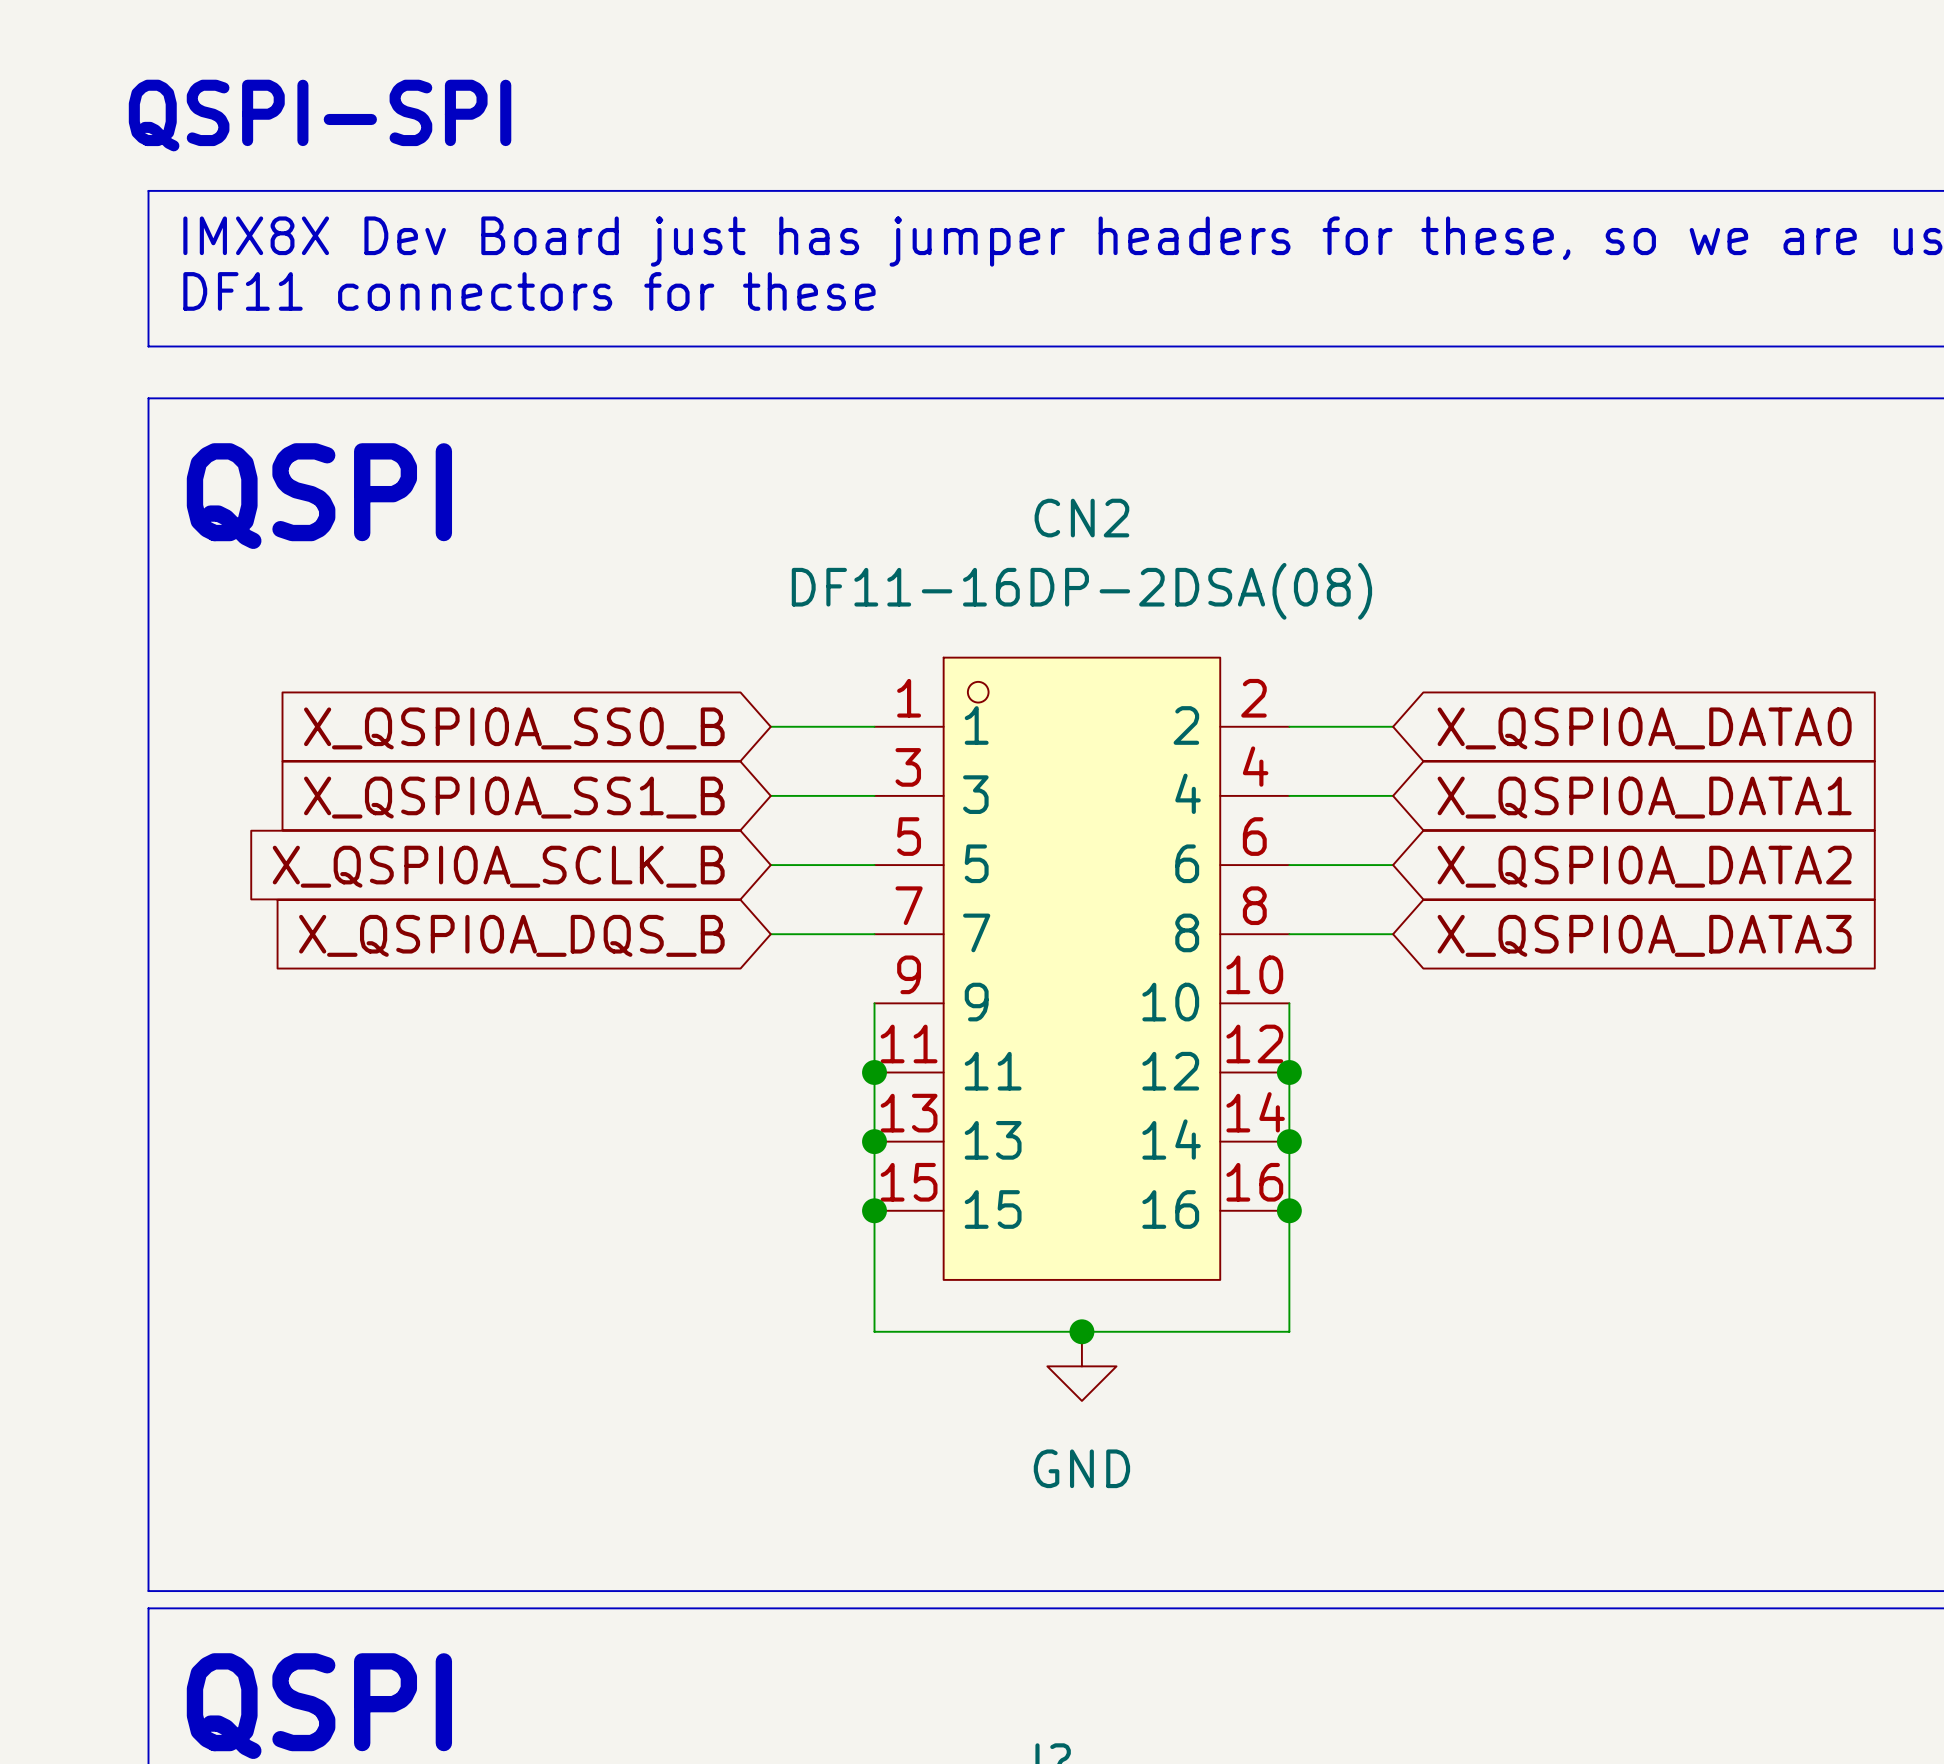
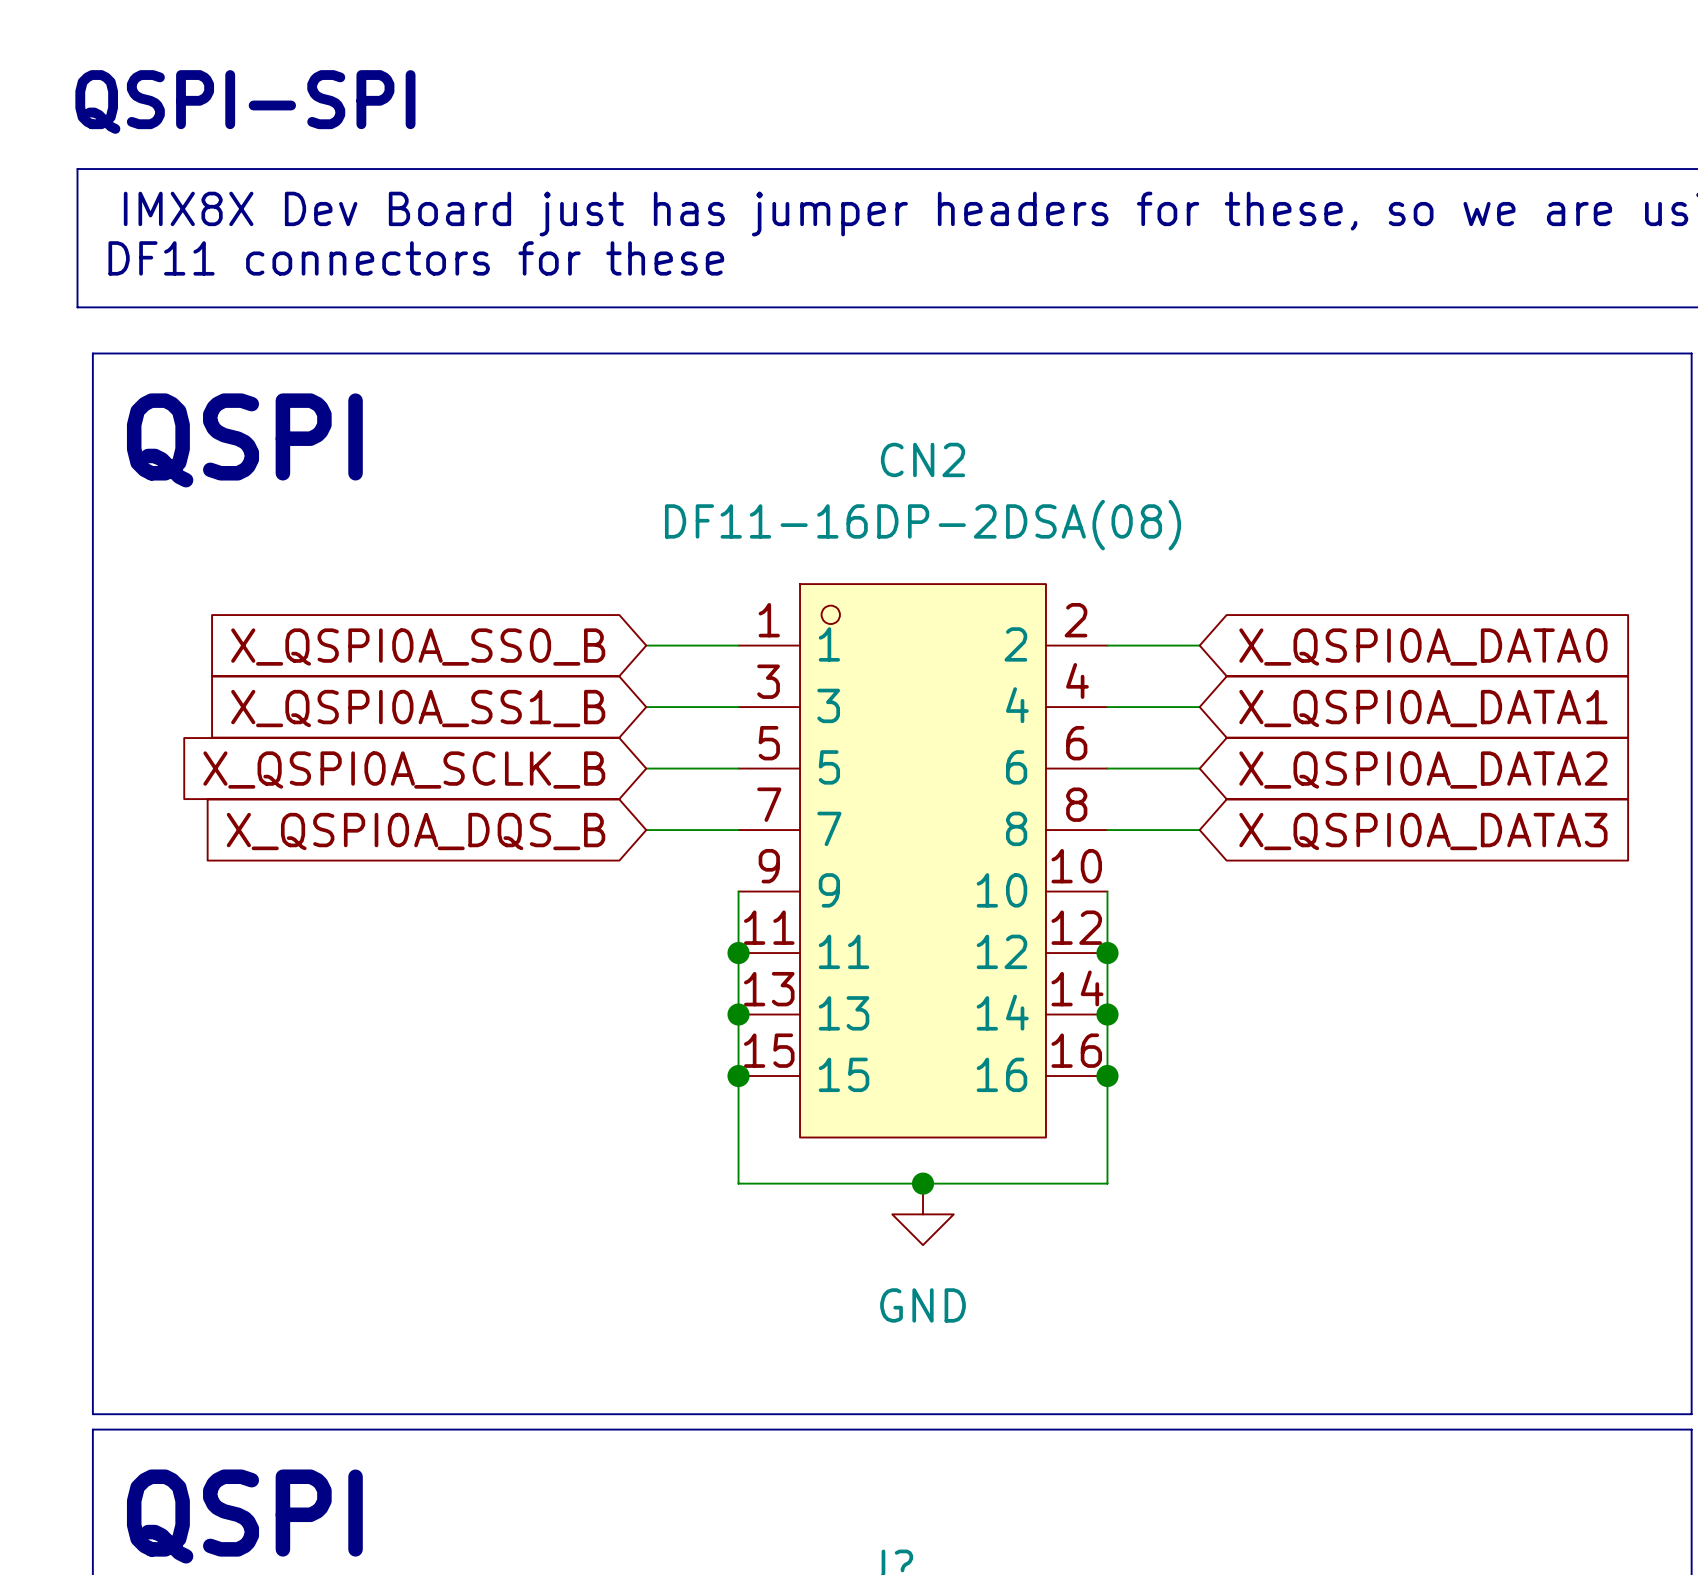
line: (148, 190) (148, 346) -> (92, 169) (77, 169) (77, 307) (92, 307)
text position: DF11 connectors for these (529, 291) -> DF11 connectors for these (416, 258)

